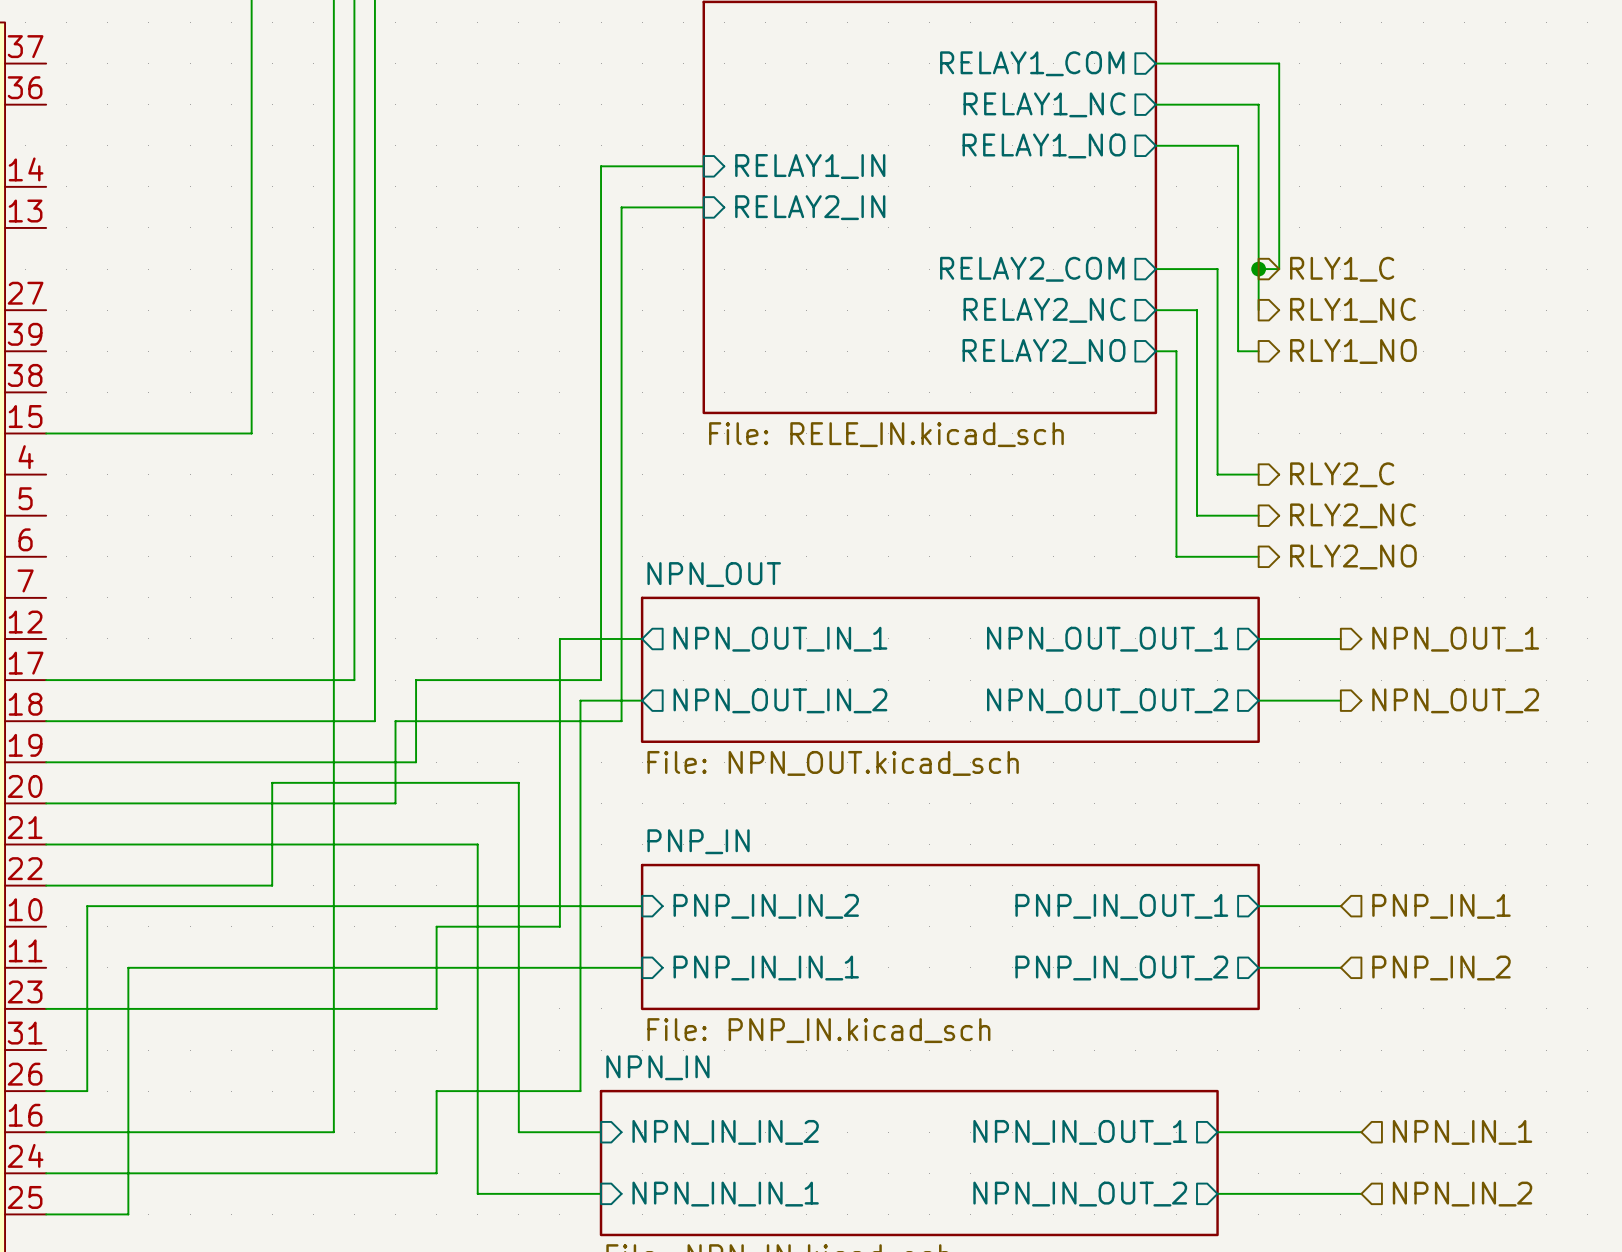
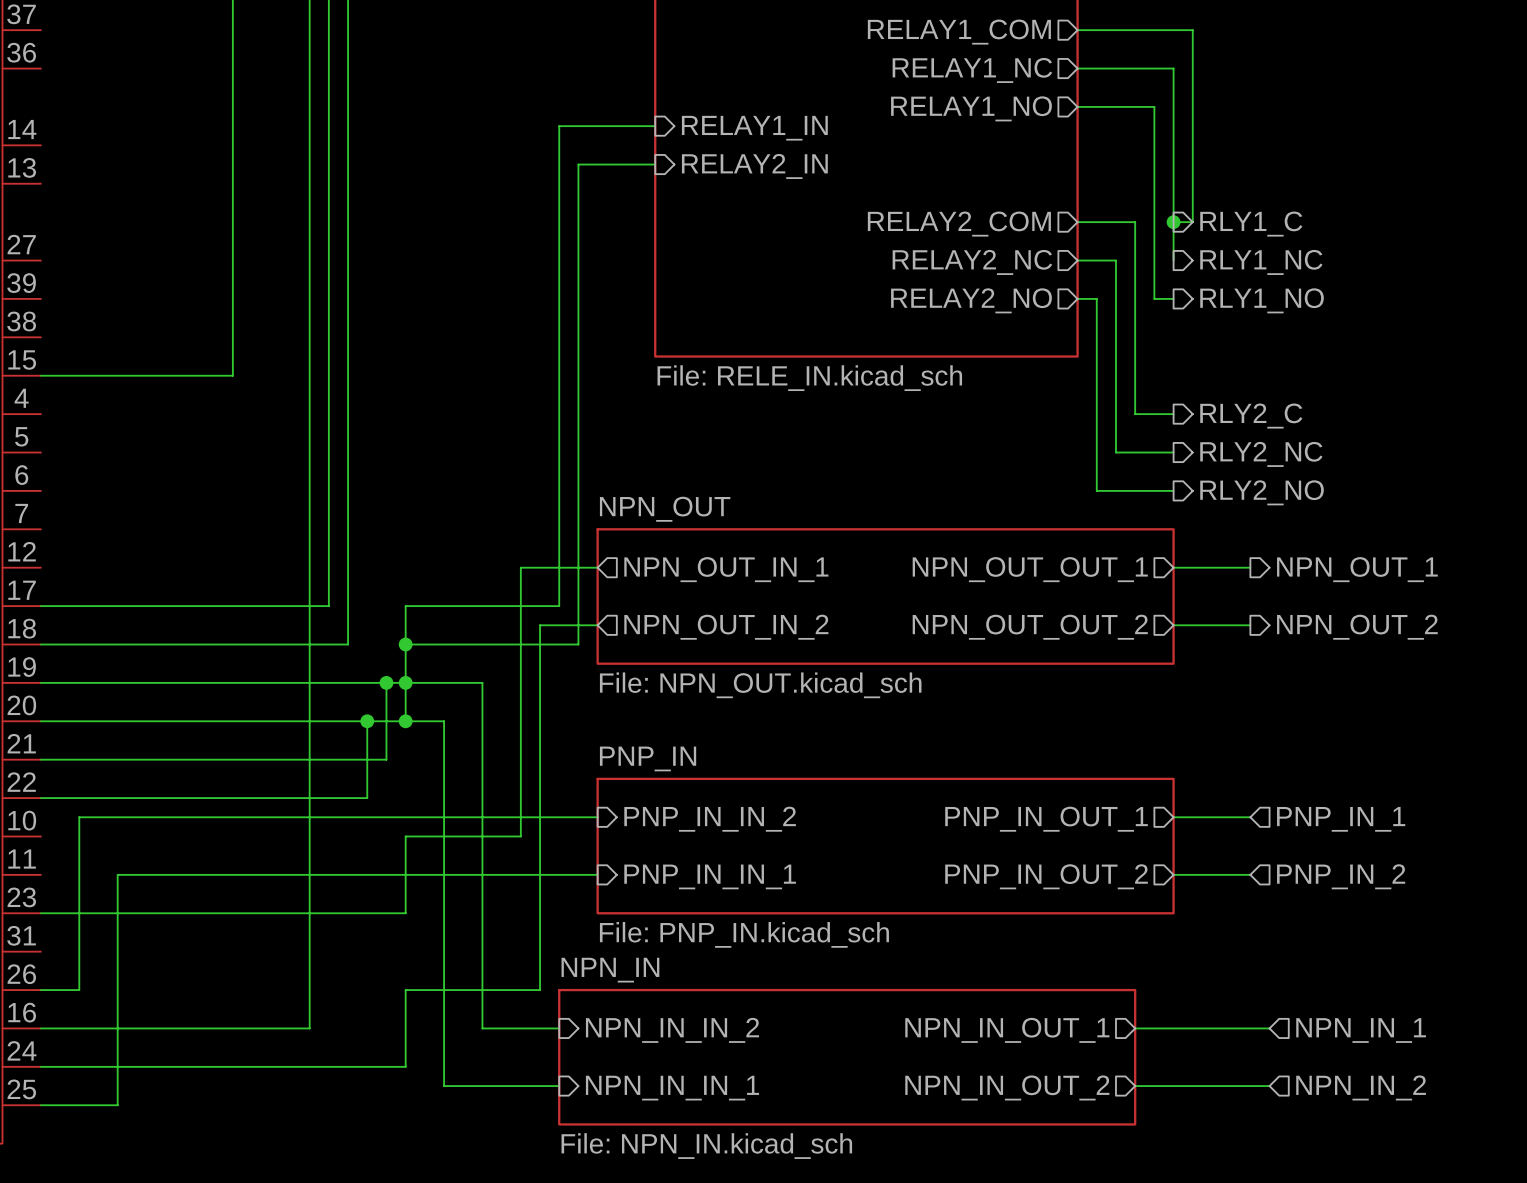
wire: (436, 680) (416, 680) (416, 762) -> (405, 606) (405, 721)
wire: (436, 721) (395, 721) (395, 803) -> none
junction: none -> (405, 644)
junction: none -> (386, 682)
junction: none -> (405, 682)
wire: (518, 782) (272, 782) (272, 885) -> (444, 759) (444, 721) (367, 721) (367, 798) (252, 798)
junction: none -> (367, 721)
junction: none -> (405, 721)
wire: (416, 844) (477, 844) -> (386, 759) (386, 682) (482, 682) (482, 702)

